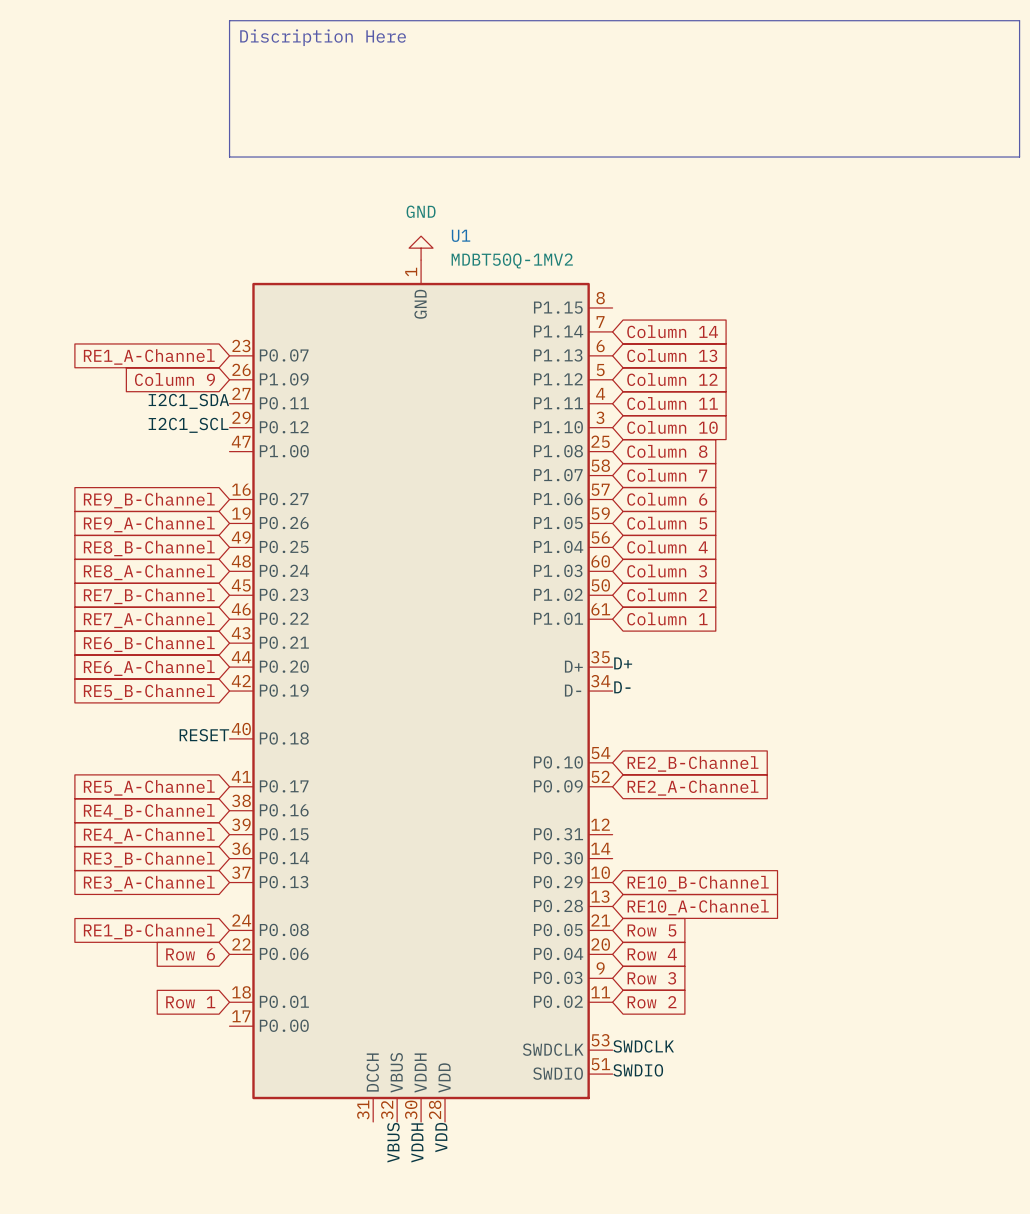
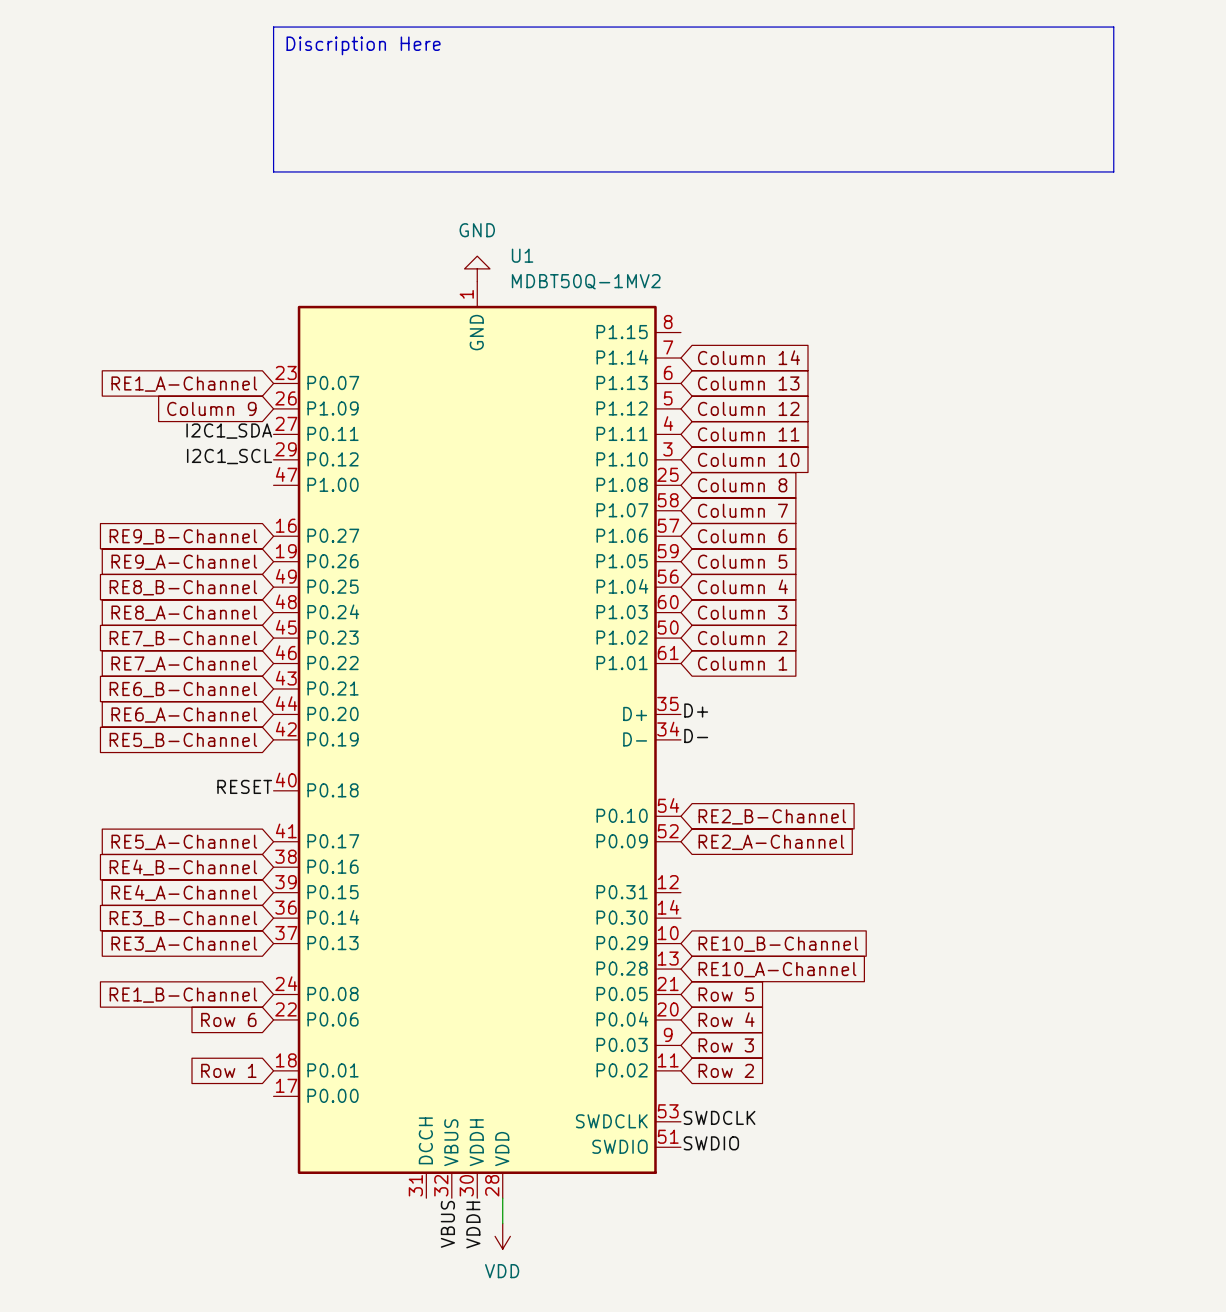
wire: none -> (502, 1198) (502, 1223)
label: VDD (441, 1137) -> none
power symbol: none -> VDD (502, 1236)

